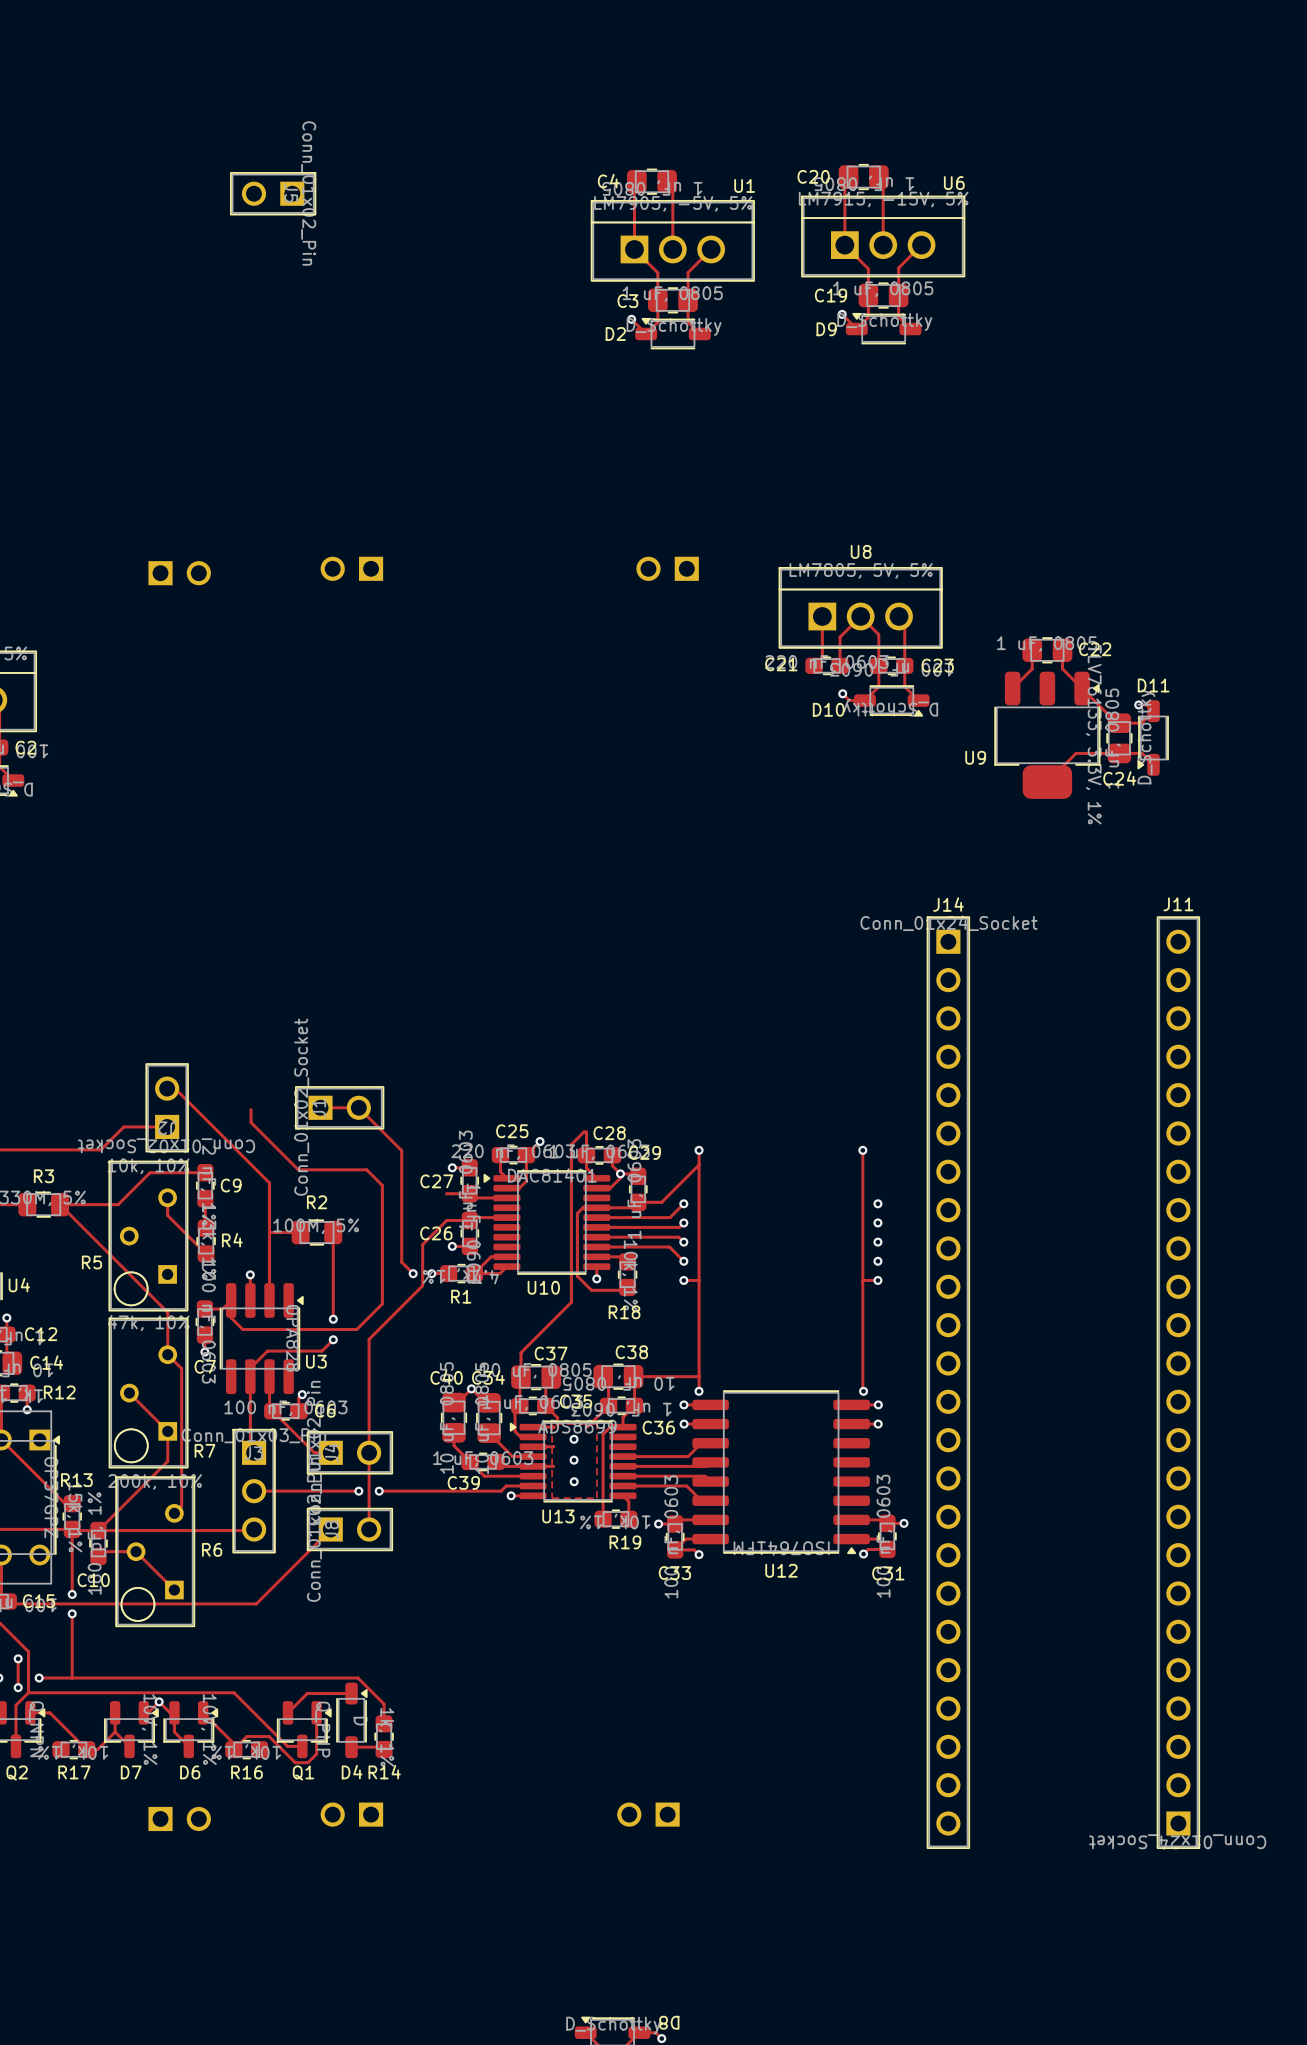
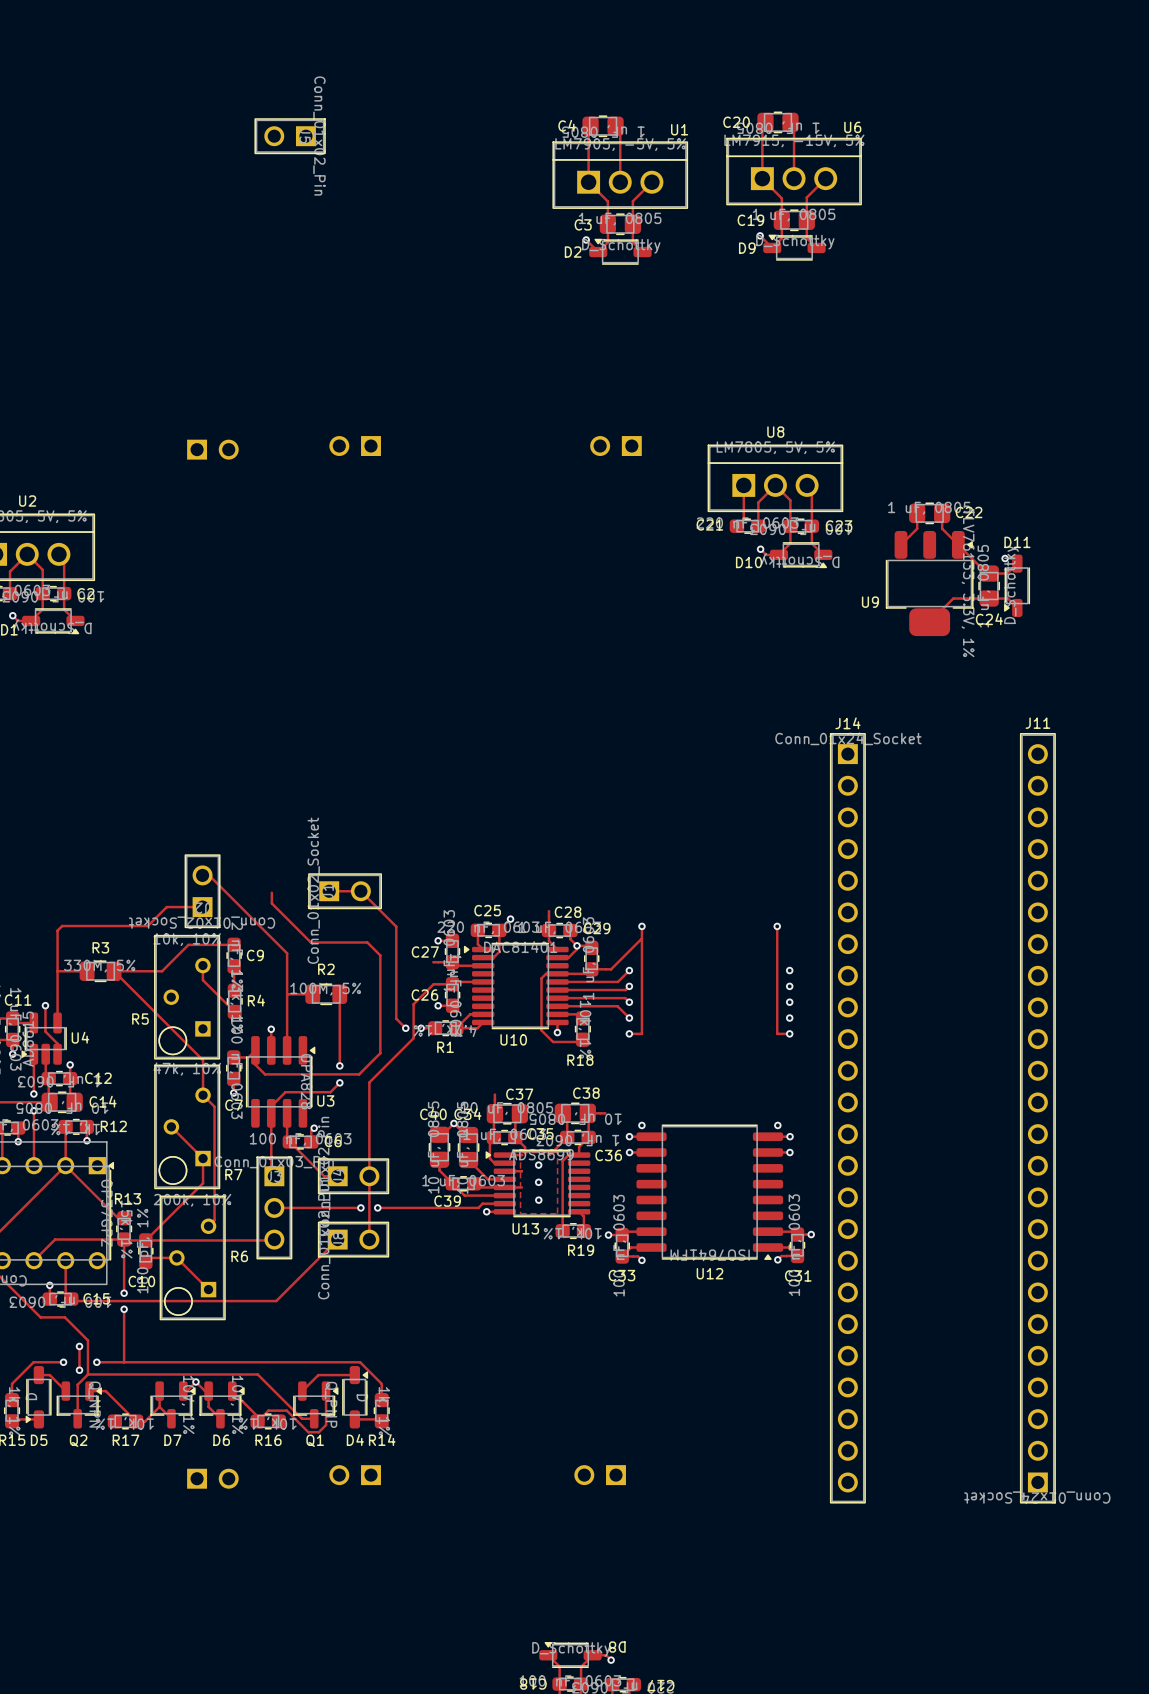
track: (586, 1131) (584, 1131) (571, 1144) (571, 1302) (521, 1354) -> none
track: (699, 1280) (699, 1391) -> none
track: (862, 1280) (863, 1391) -> none
track: (654, 1376) (699, 1376) -> none
track: (710, 1443) (701, 1443) (688, 1456) (623, 1456) -> none
track: (710, 1462) (706, 1466) (623, 1466) -> none
track: (623, 1476) (705, 1476) (710, 1481) -> none
track: (623, 1486) (686, 1486) (701, 1500) (710, 1500) -> none

